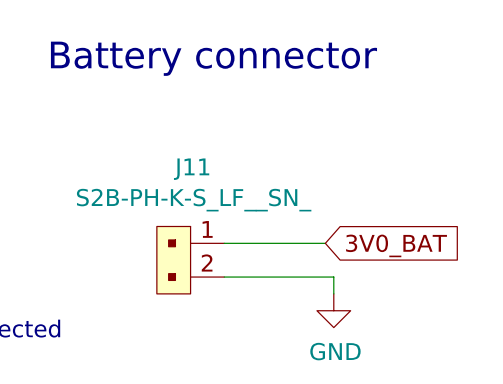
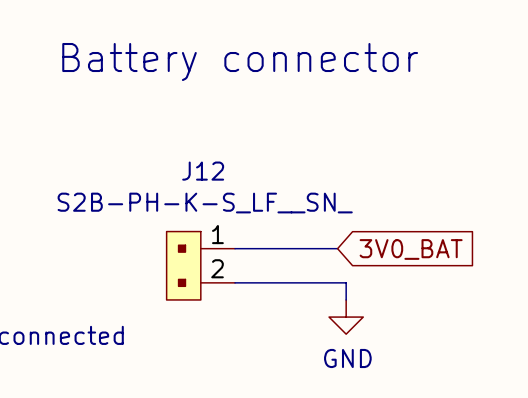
J11 name: J11 (191, 169) -> J12 (203, 171)

